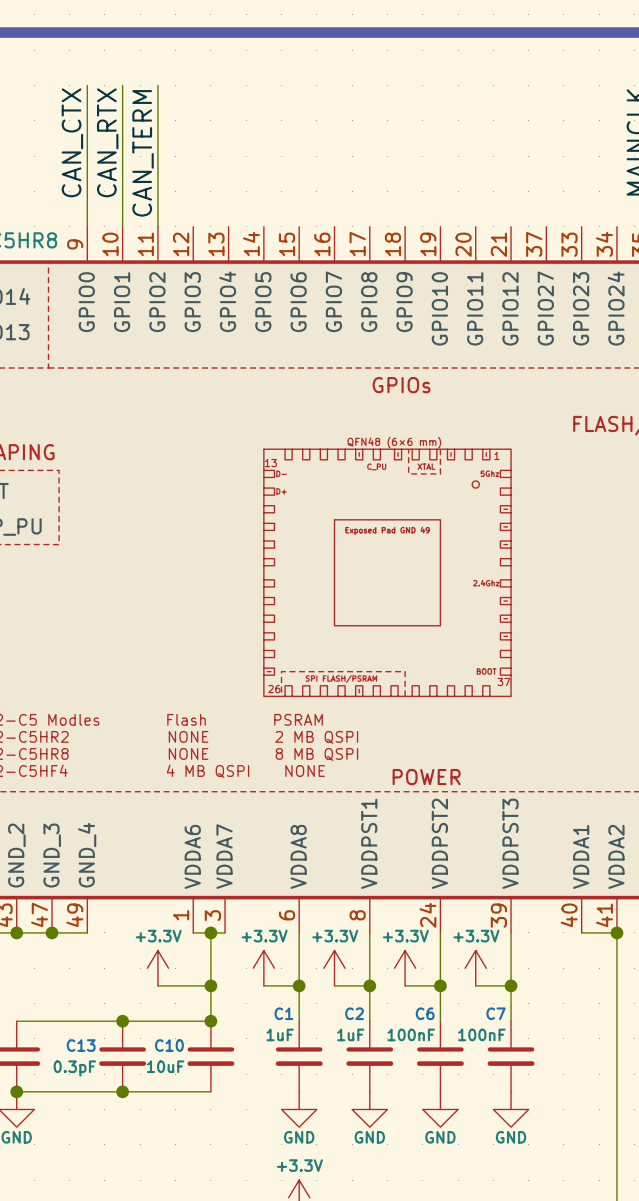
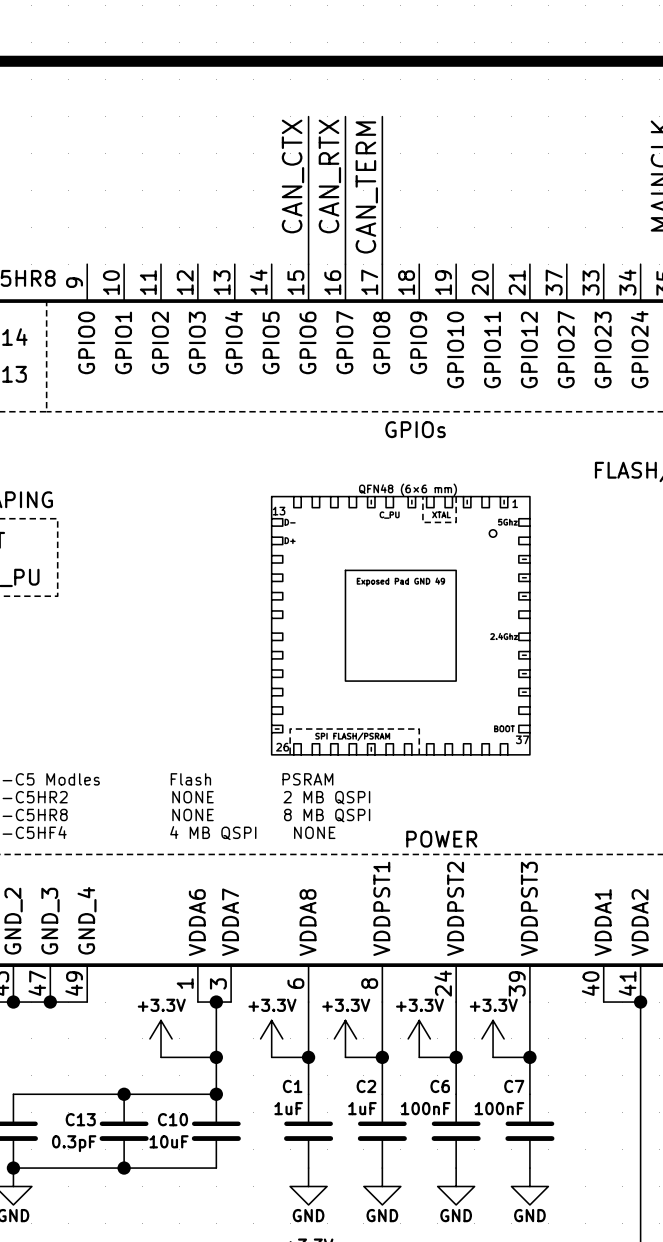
wire: (87, 85) (87, 226) -> (308, 116) (308, 264)
wire: (122, 85) (122, 226) -> (345, 116) (345, 264)
wire: (157, 85) (157, 226) -> (382, 116) (382, 264)
label position: CAN_CTX (72, 142) -> CAN_CTX (292, 176)
label position: CAN_RTX (107, 142) -> CAN_RTX (329, 176)
label position: CAN_TERM (143, 153) -> CAN_TERM (366, 187)

